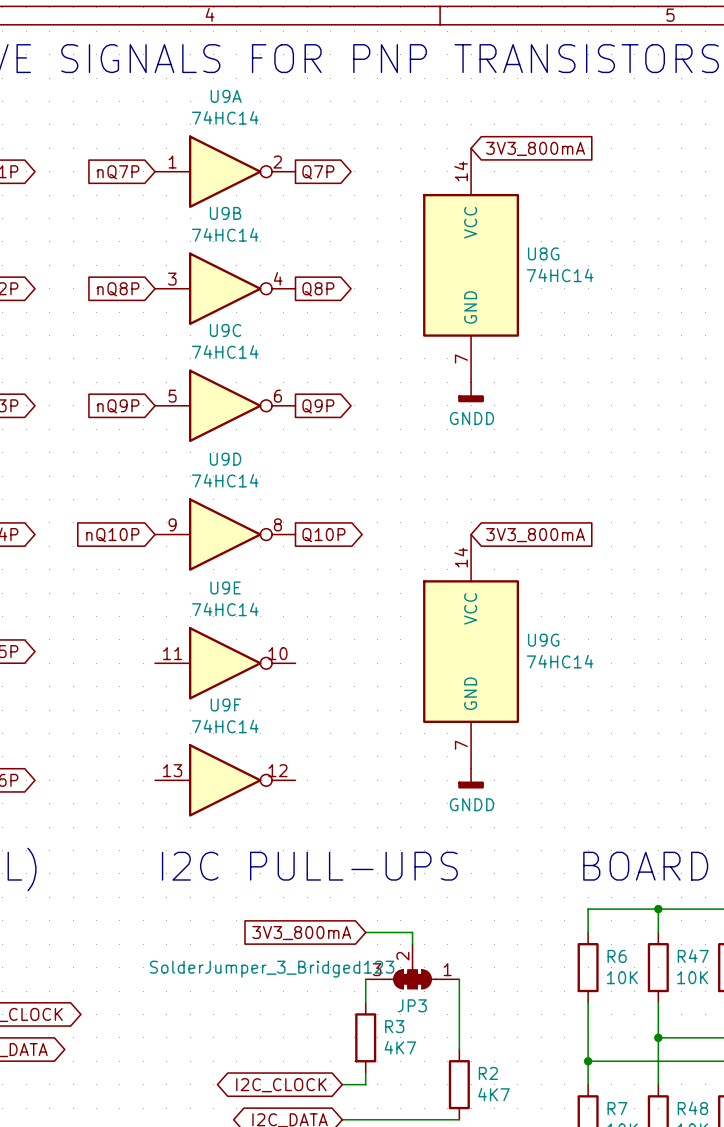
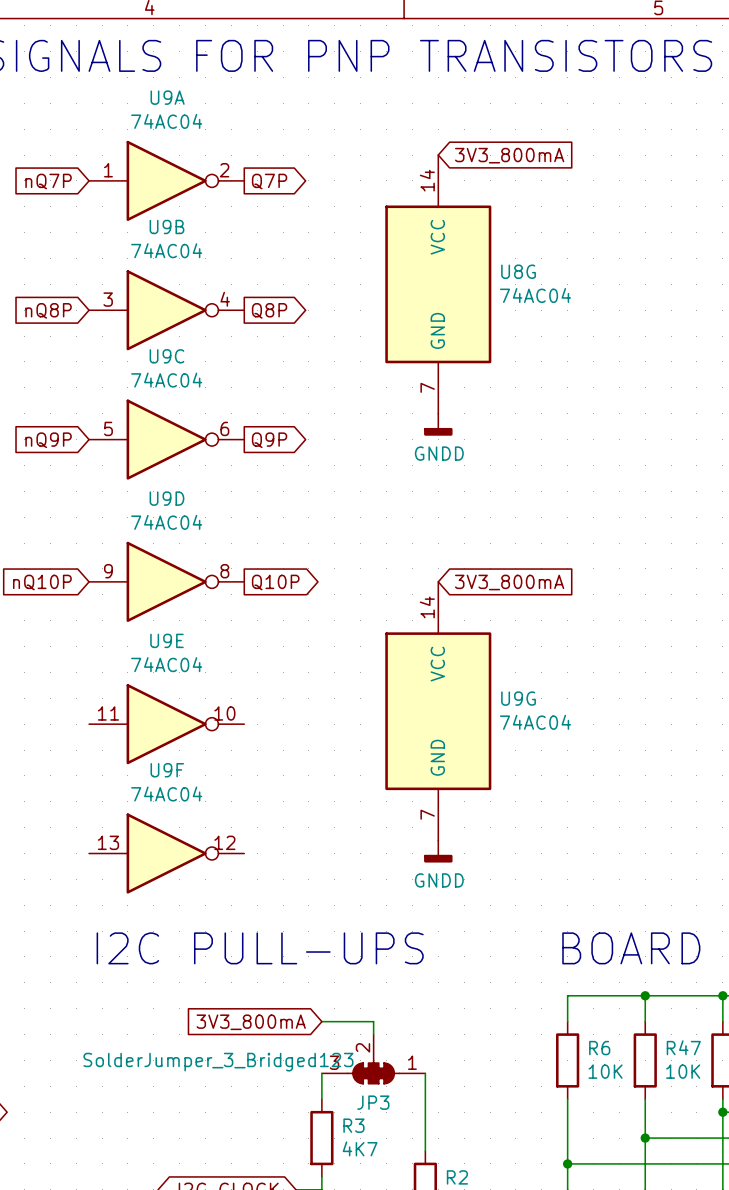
U9A value: 74HC14 (225, 117) -> 74AC04 (166, 121)
U9B value: 74HC14 (225, 234) -> 74AC04 (166, 250)
U8G value: 74HC14 (560, 275) -> 74AC04 (535, 295)
U9C value: 74HC14 (225, 351) -> 74AC04 (166, 380)
U9D value: 74HC14 (225, 480) -> 74AC04 (166, 522)
U9E value: 74HC14 (225, 609) -> 74AC04 (166, 664)
U9G value: 74HC14 (560, 661) -> 74AC04 (535, 722)
U9F value: 74HC14 (225, 726) -> 74AC04 (166, 793)

